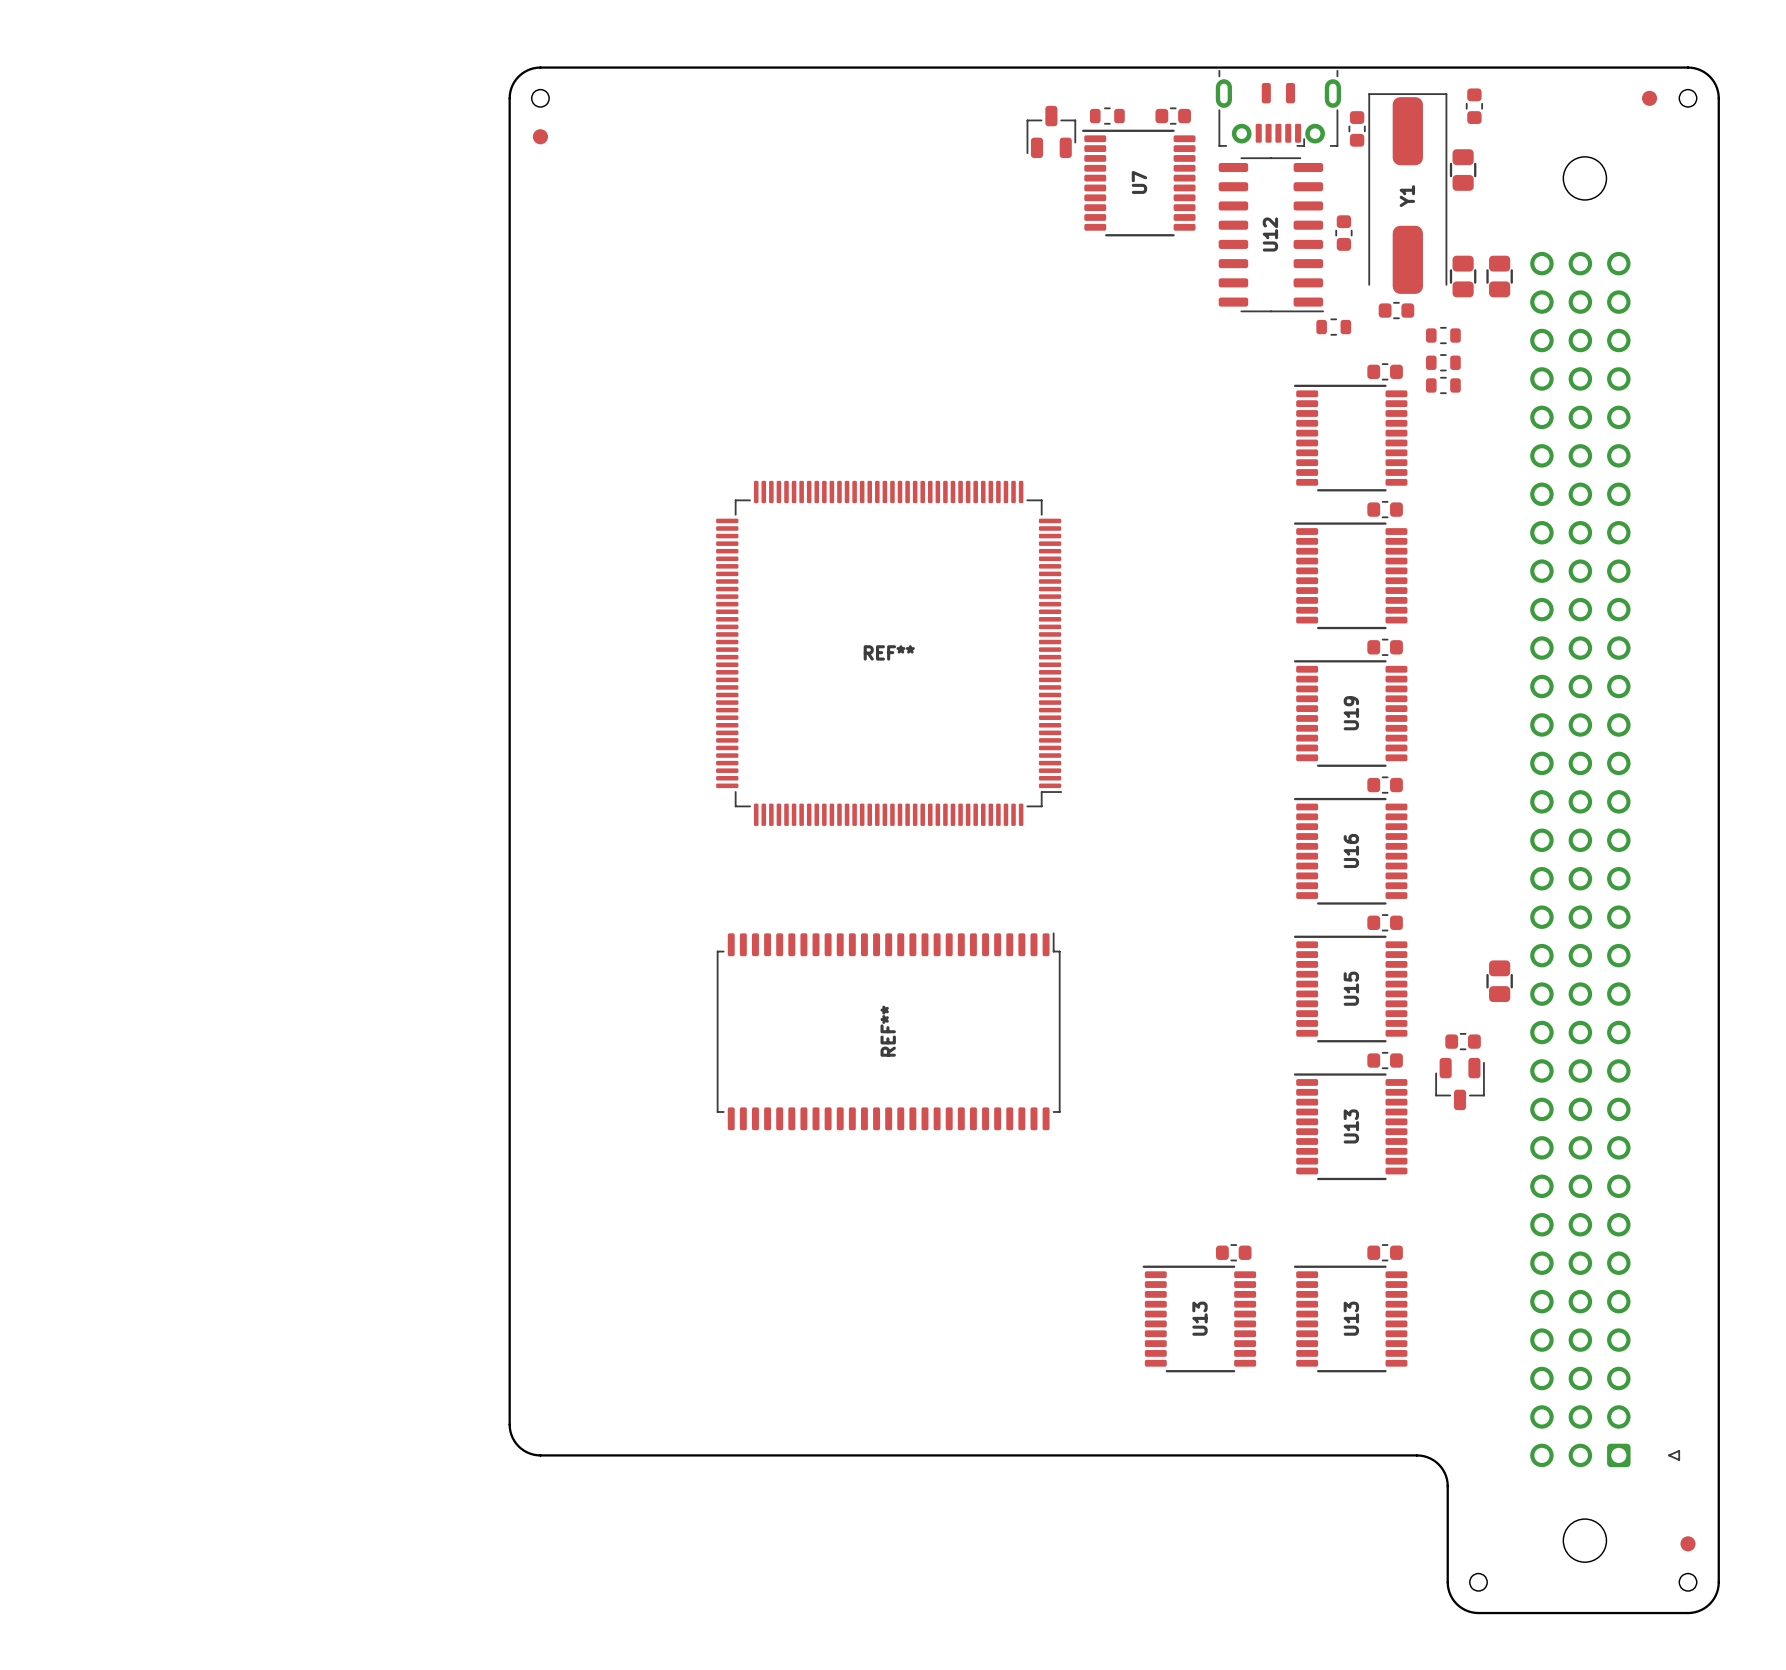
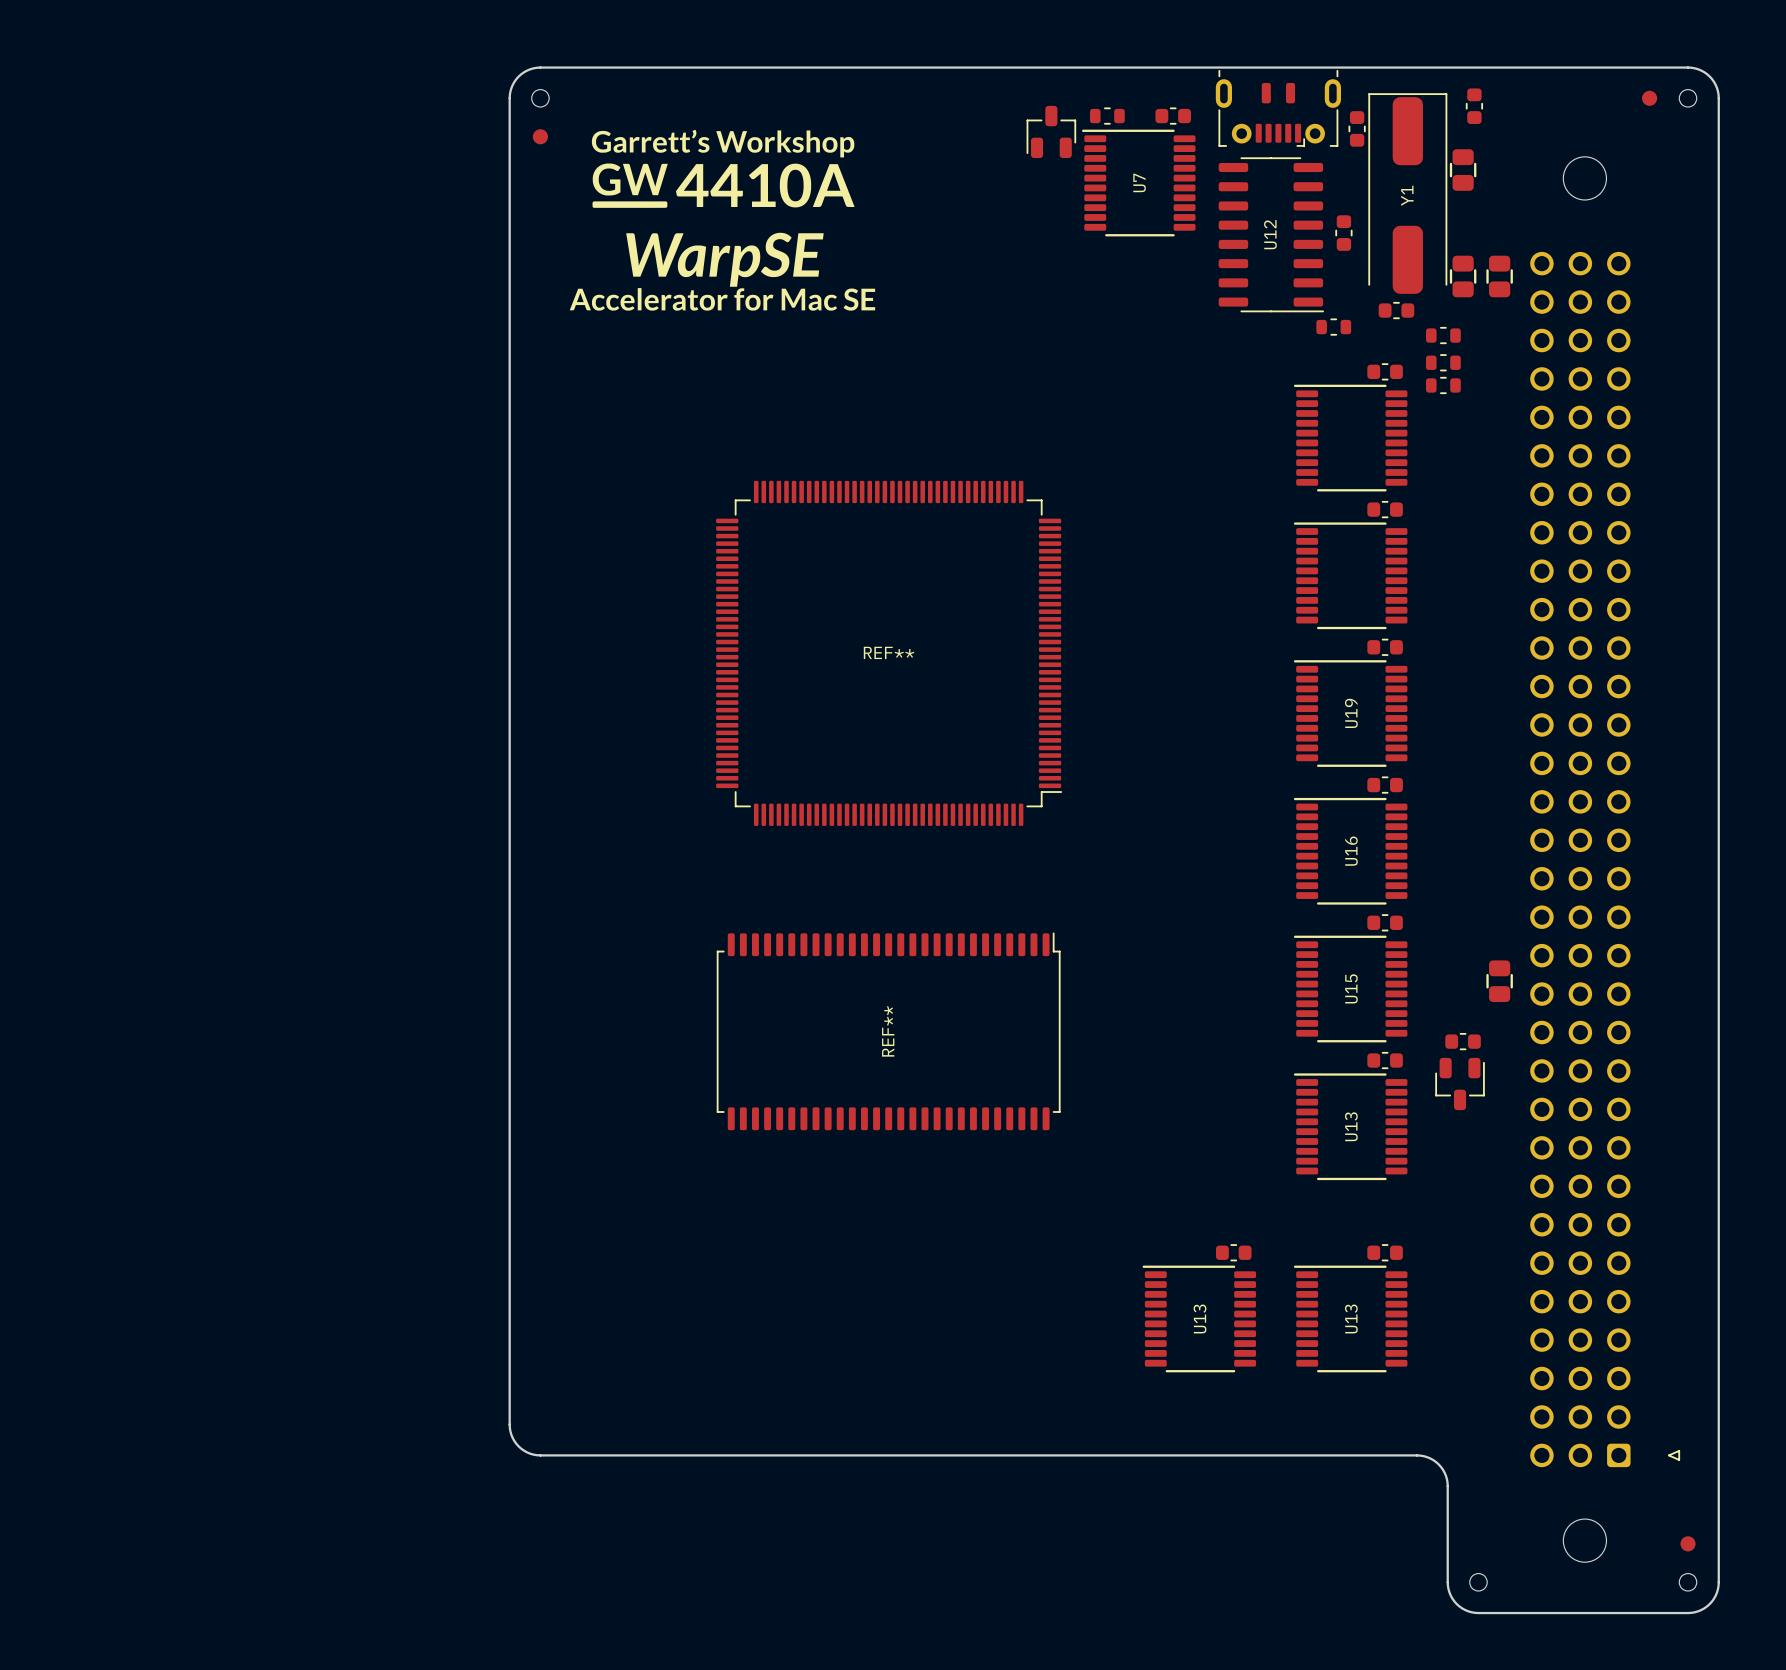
drawing: none -> [591, 129, 855, 208]
drawing: none -> [569, 232, 876, 311]

